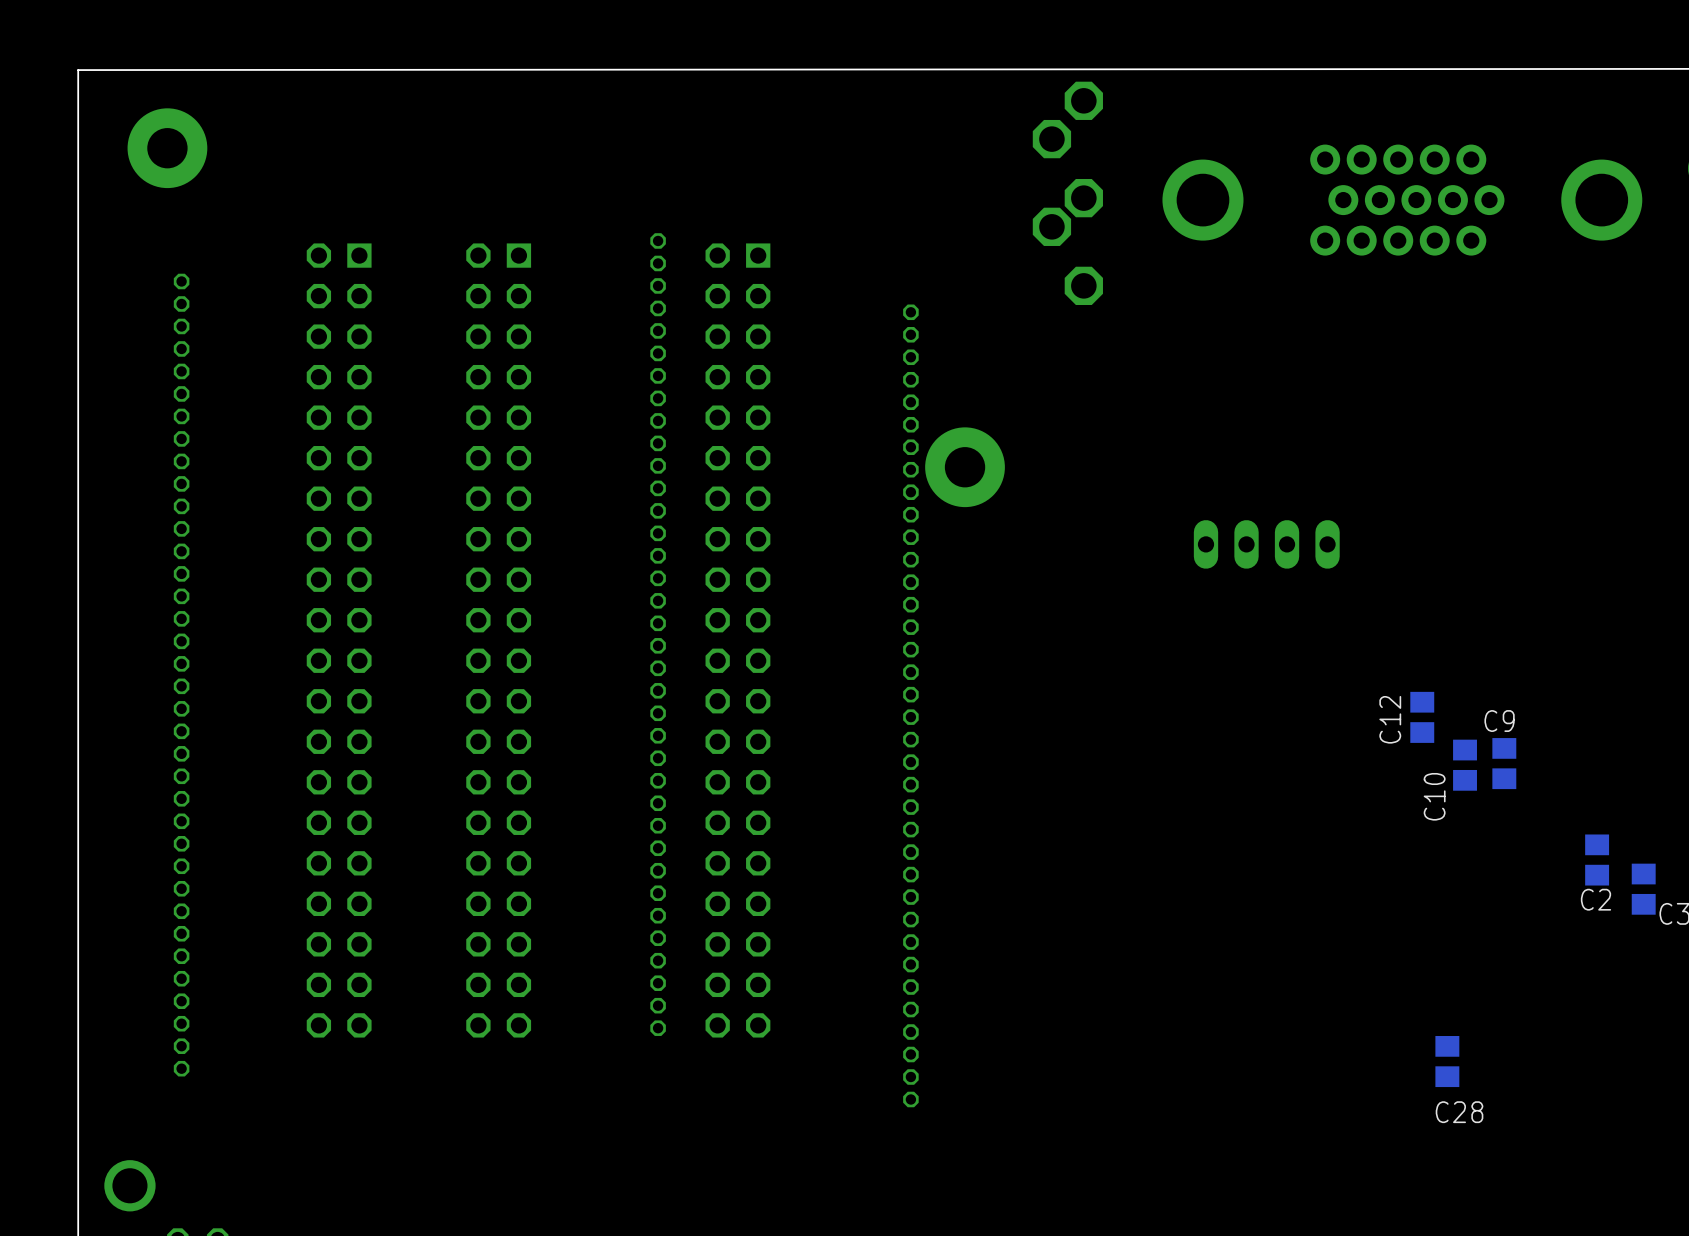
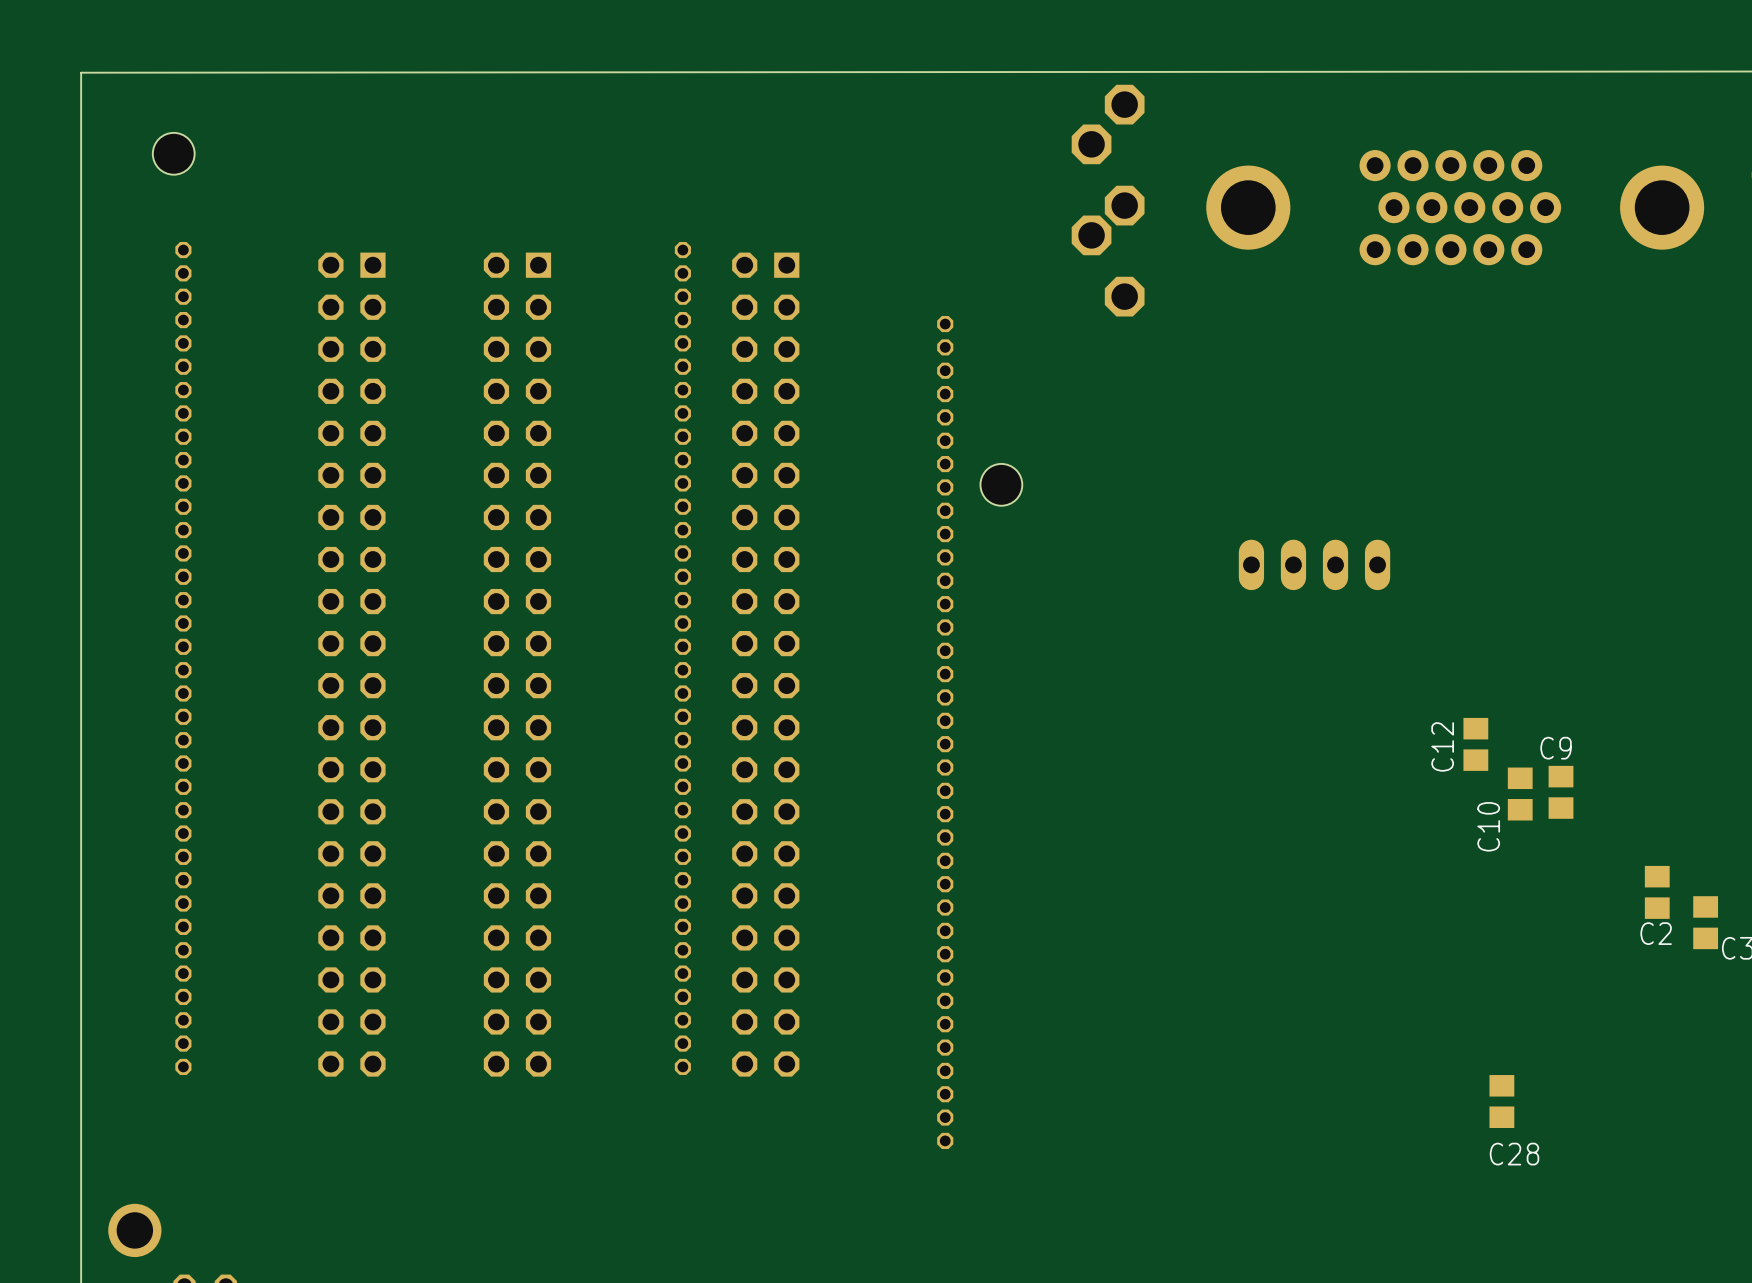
part: (167, 148) -> none
hole: none -> (173, 153)
part: (965, 467) -> none
hole: none -> (1001, 484)
part position: (181, 675) -> (183, 658)

